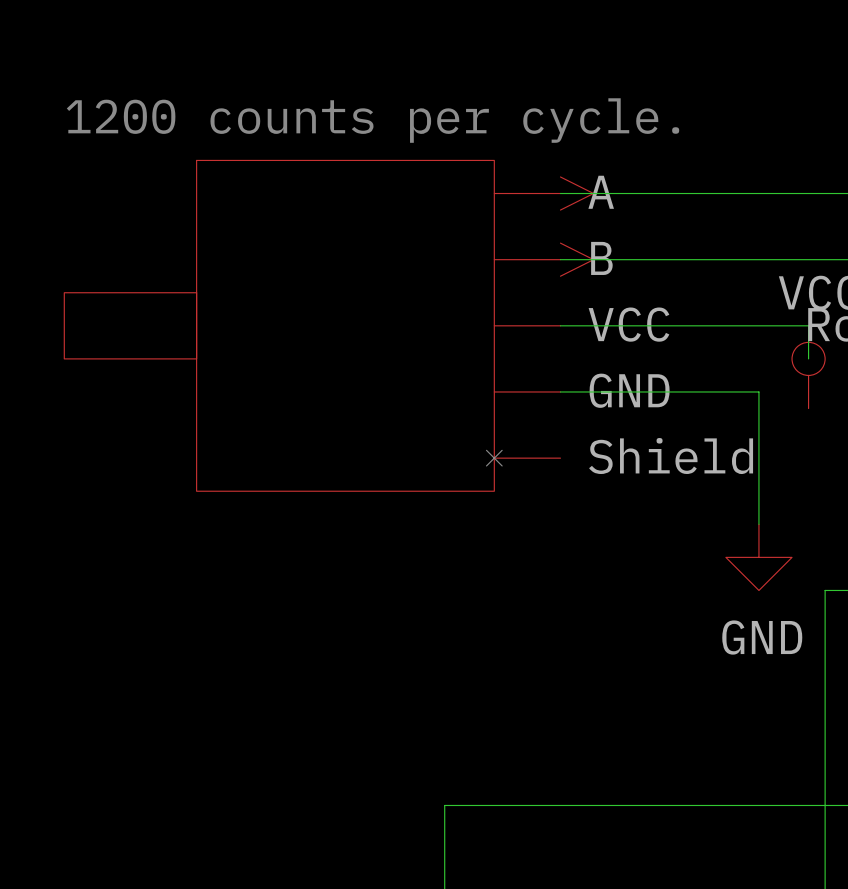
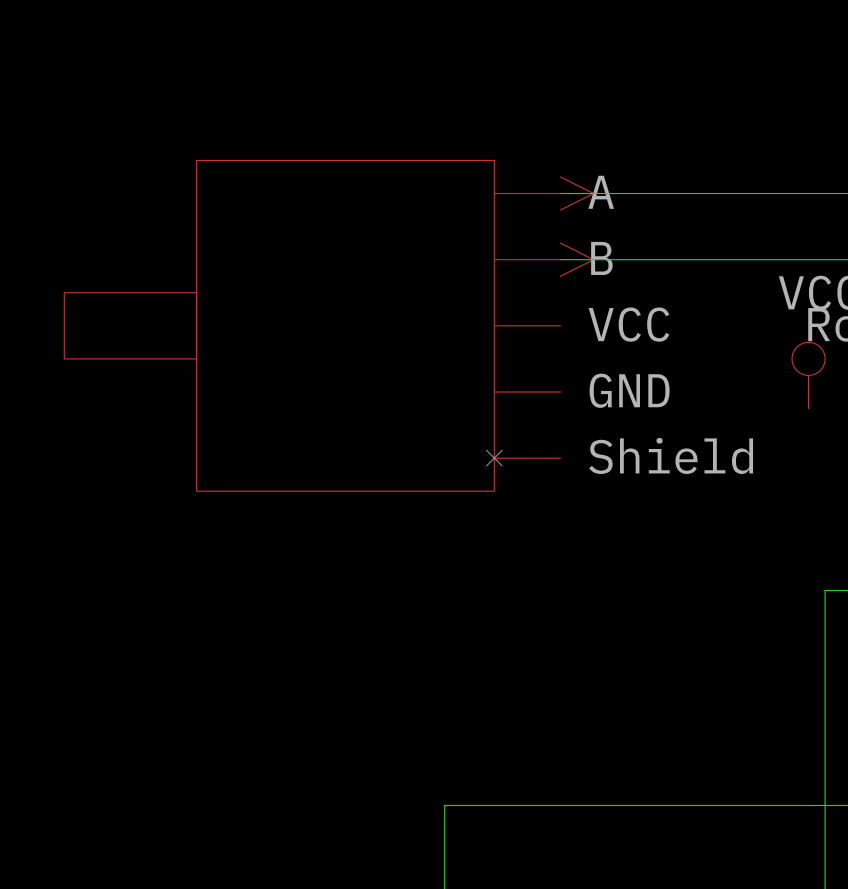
text: 1200 counts per cycle. (372, 120) -> none
wire: (560, 325) (808, 325) (808, 358) -> none
wire: (560, 391) (758, 391) (758, 524) -> none
power symbol: GND (758, 557) -> none

